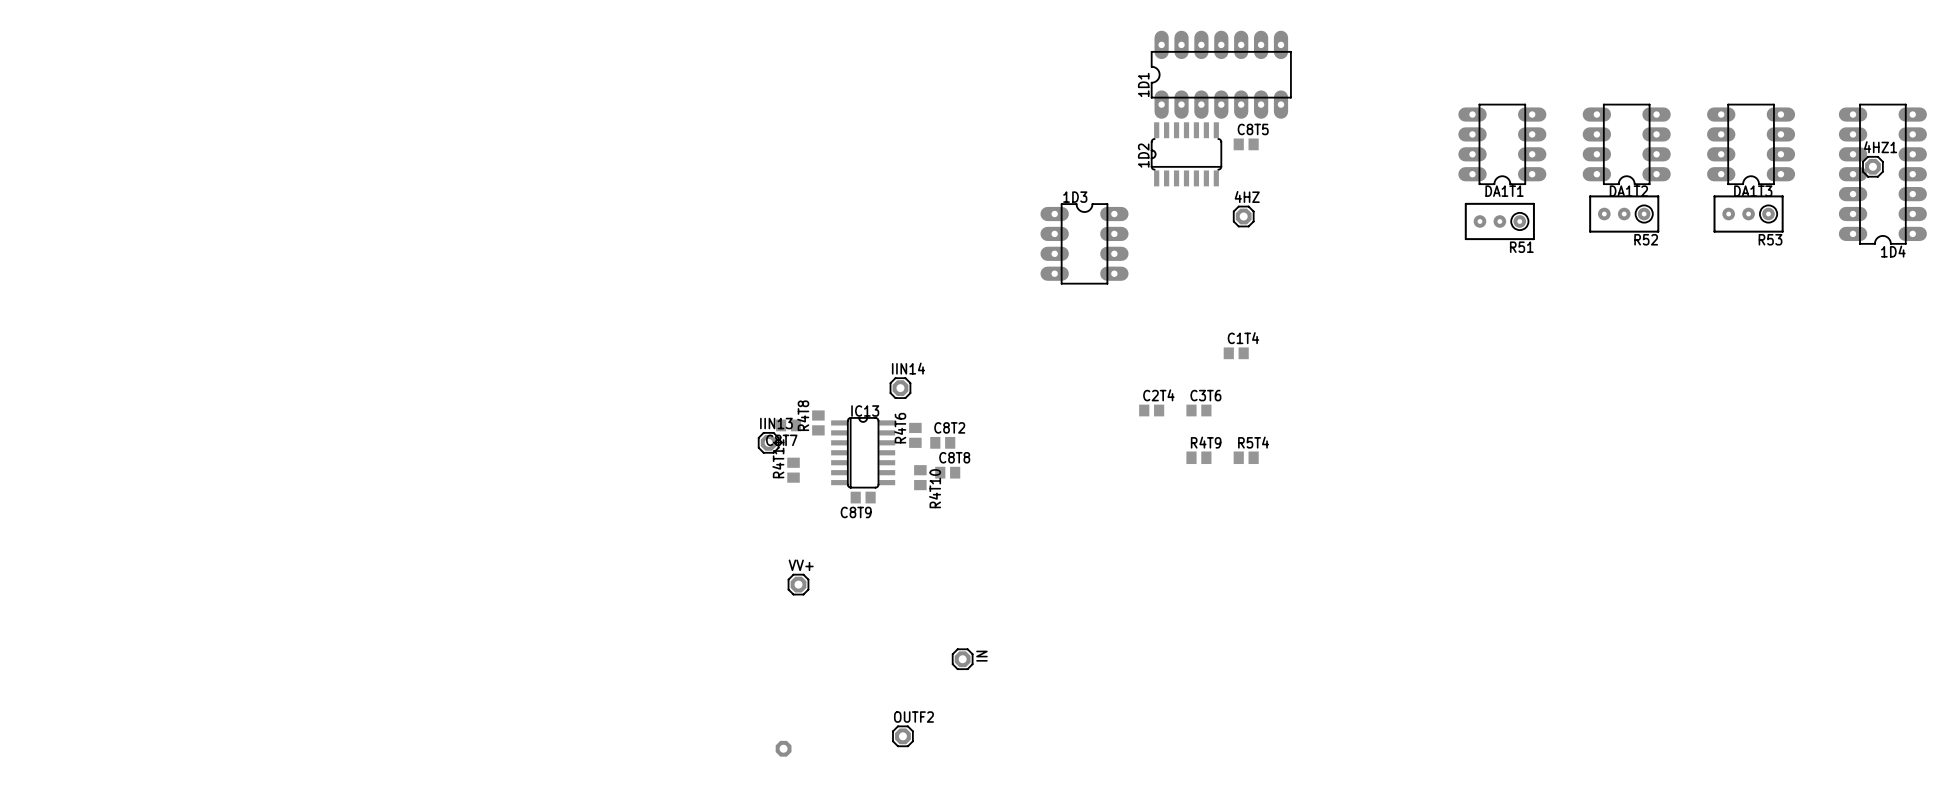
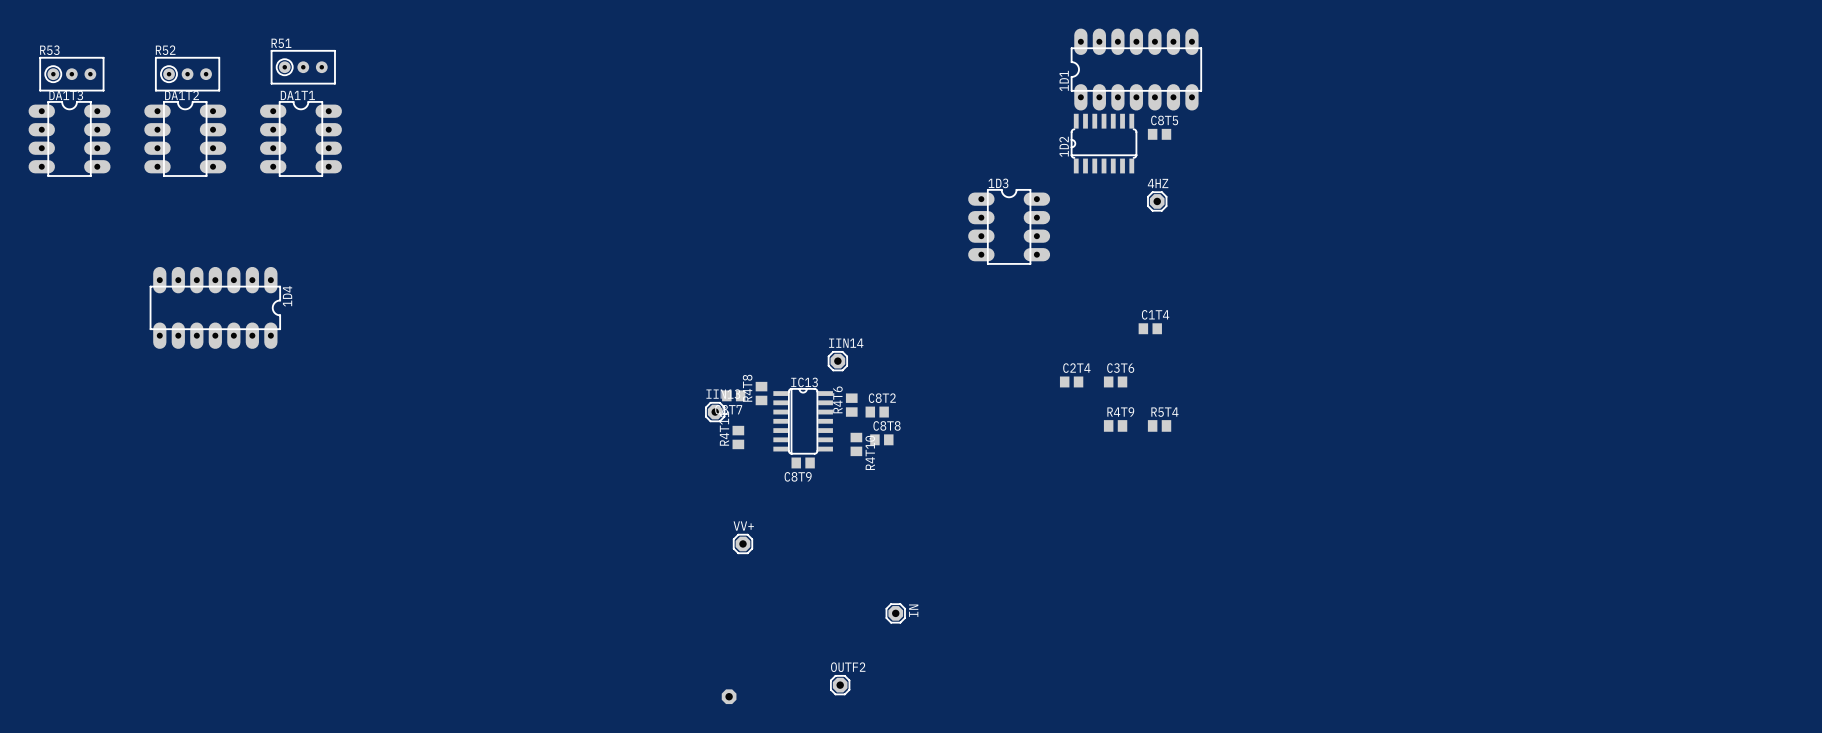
DA1T1 rotation: 0° (1502, 144) -> 180° (300, 138)
DA1T1 position: (1502, 144) -> (300, 138)
DA1T2 rotation: 0° (1626, 144) -> 180° (185, 138)
DA1T2 position: (1626, 144) -> (185, 138)
DA1T3 rotation: 0° (1751, 144) -> 180° (69, 138)
DA1T3 position: (1751, 144) -> (69, 138)
4HZ1: (1872, 166) -> none
1D4 rotation: 0° (1882, 174) -> 90° counterclockwise (215, 307)
1D4 position: (1882, 174) -> (215, 307)
R52 rotation: 0° (1624, 214) -> 180° (187, 74)
R52 position: (1624, 214) -> (187, 74)
R53 rotation: 0° (1748, 214) -> 180° (71, 74)
R53 position: (1748, 214) -> (71, 74)
R51 rotation: 0° (1499, 221) -> 180° (303, 67)
R51 position: (1499, 221) -> (303, 67)

